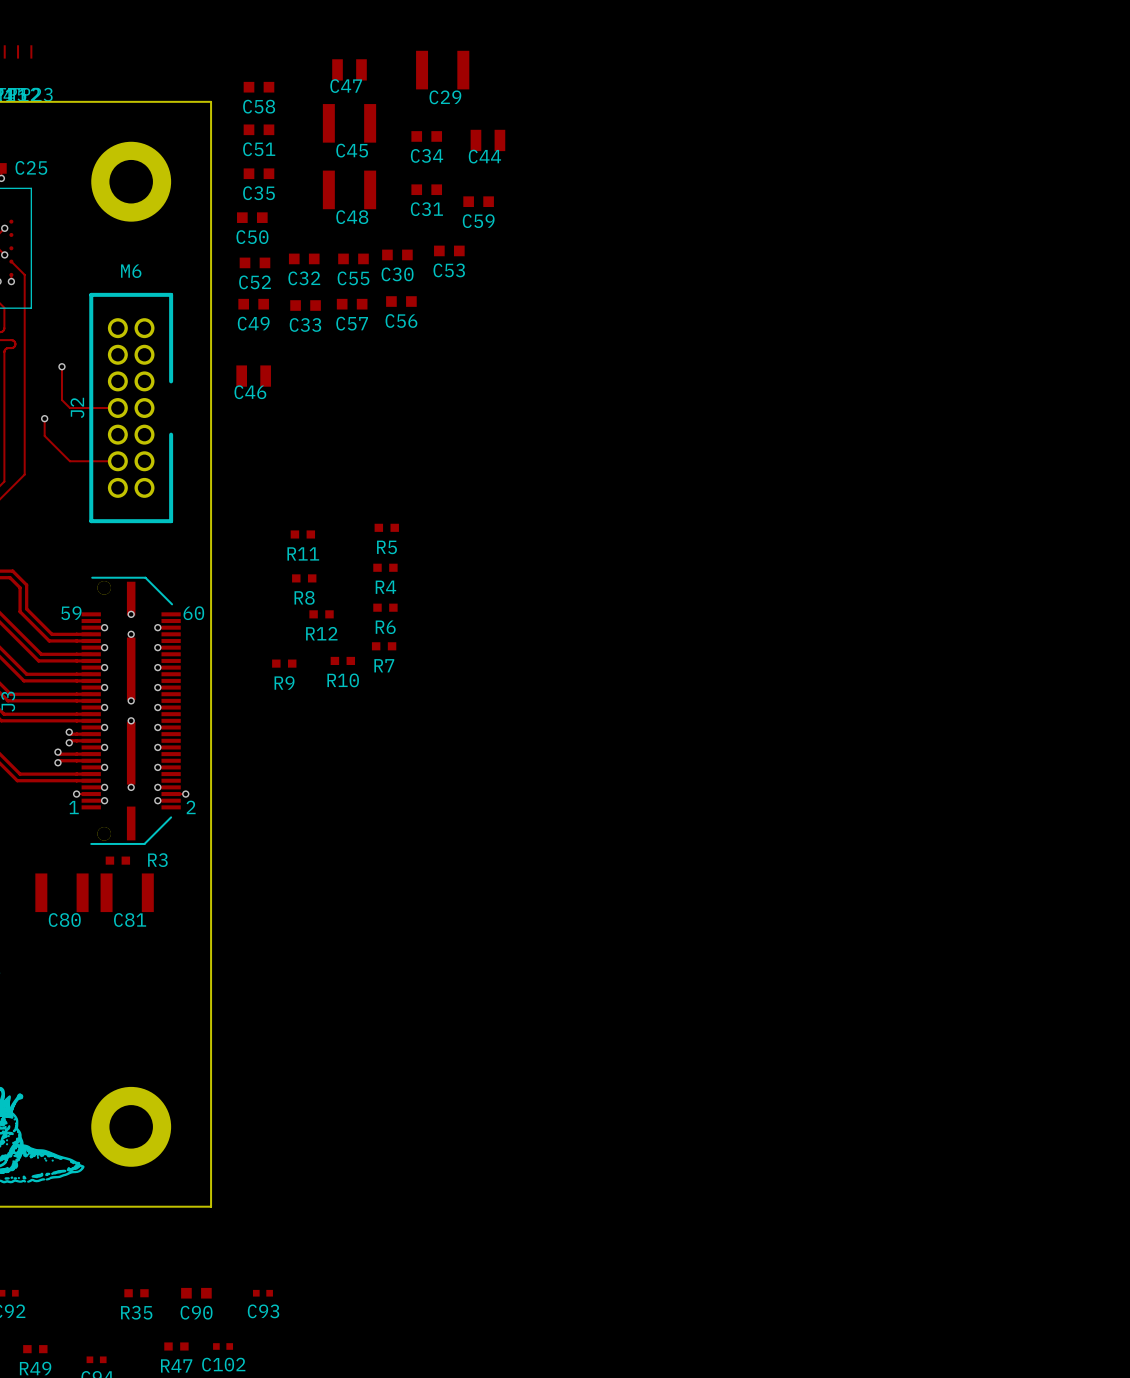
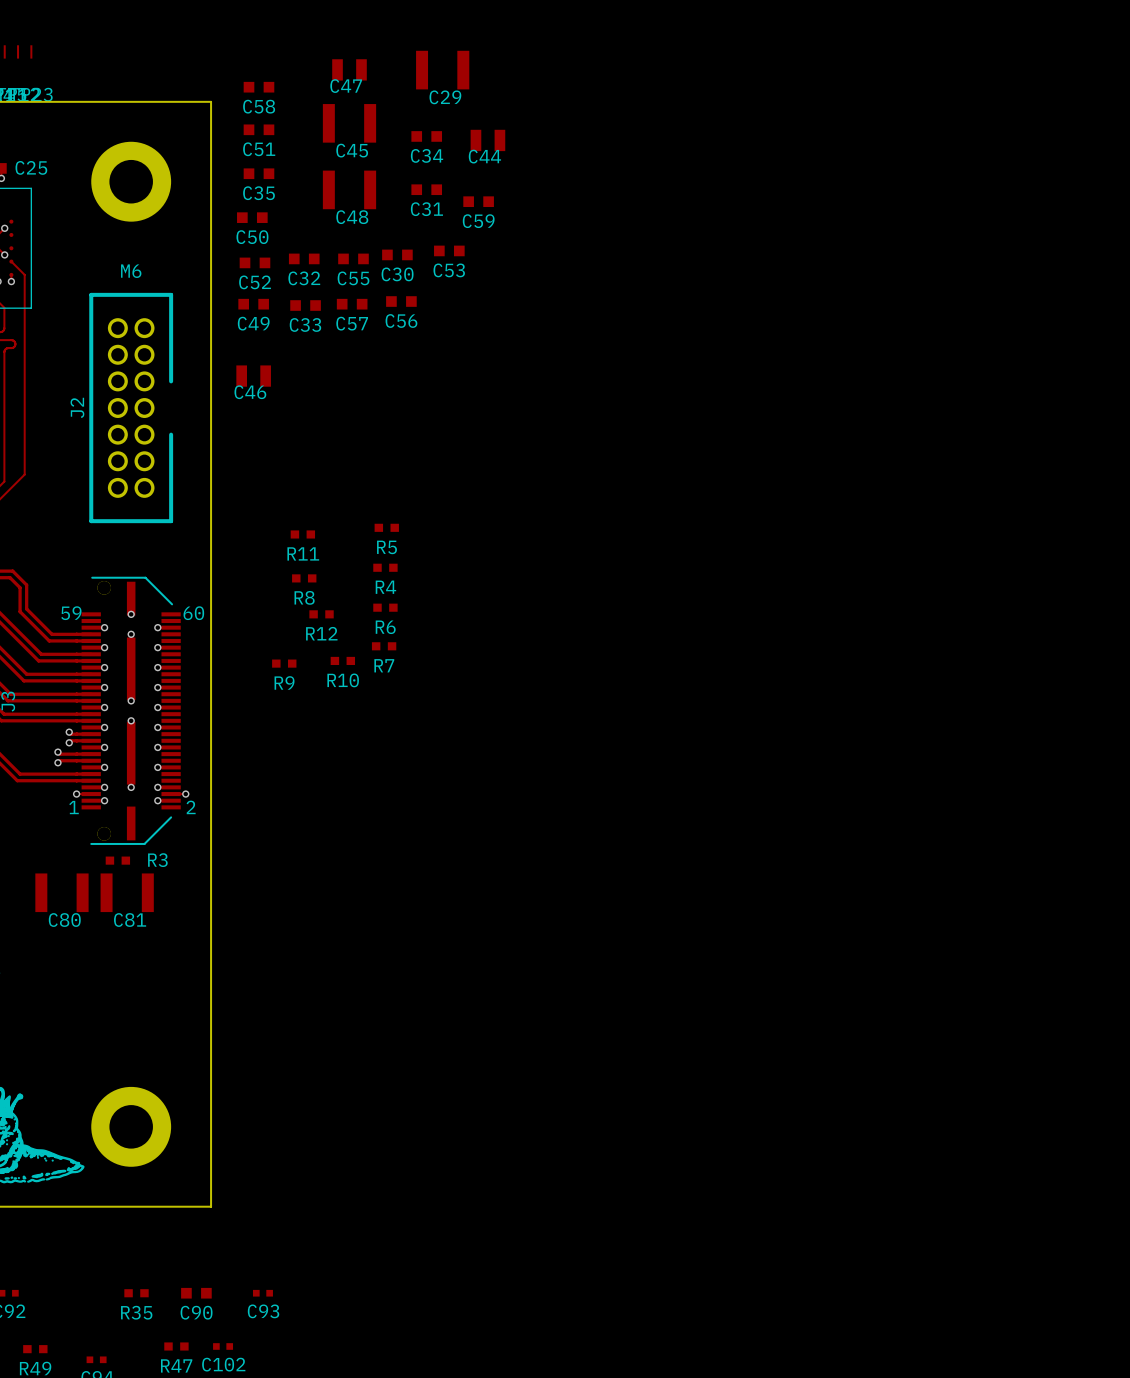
track: (61, 366) (61, 400) (69, 408) (117, 408) -> none
via: (61, 366) -> none
track: (44, 418) (44, 435) (69, 461) (117, 461) -> none
via: (44, 418) -> none

